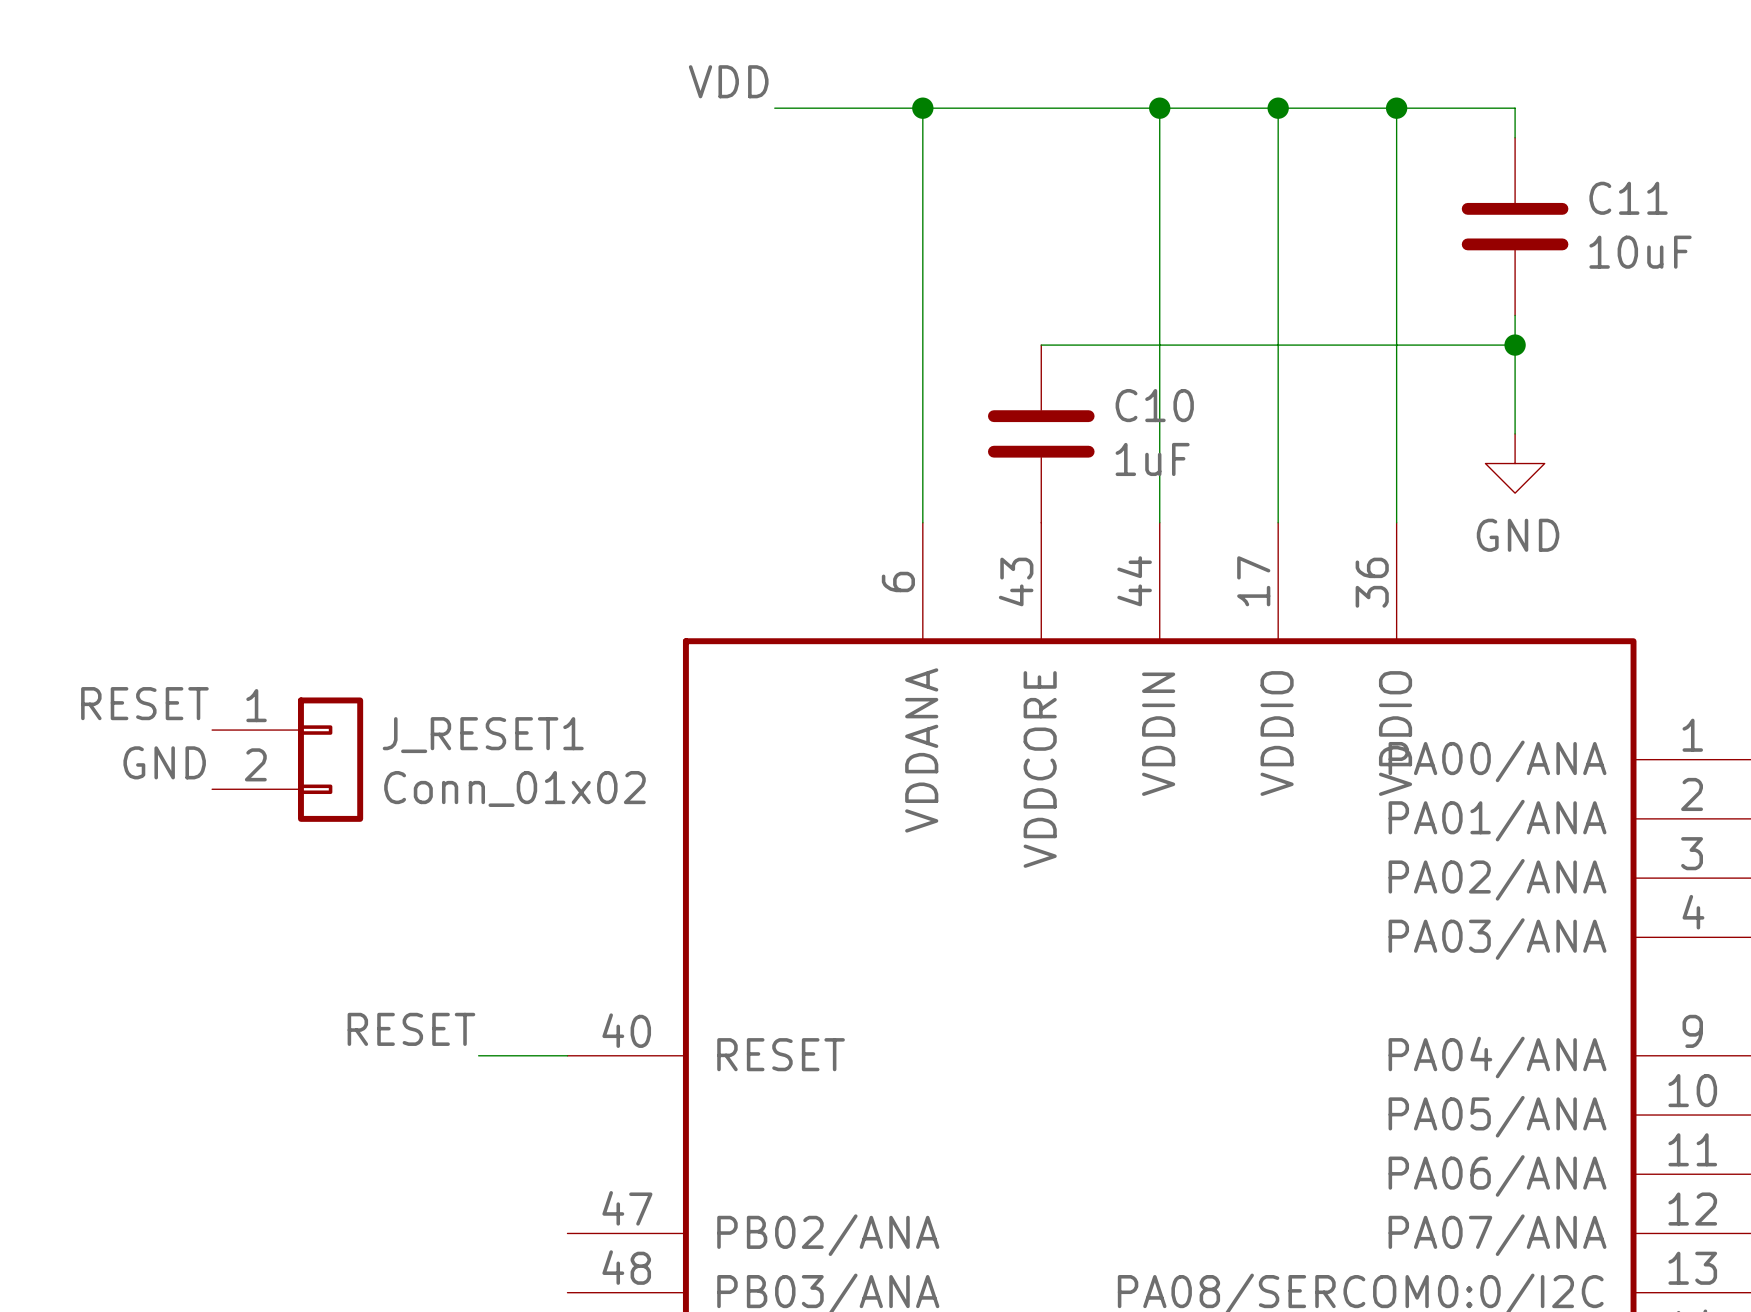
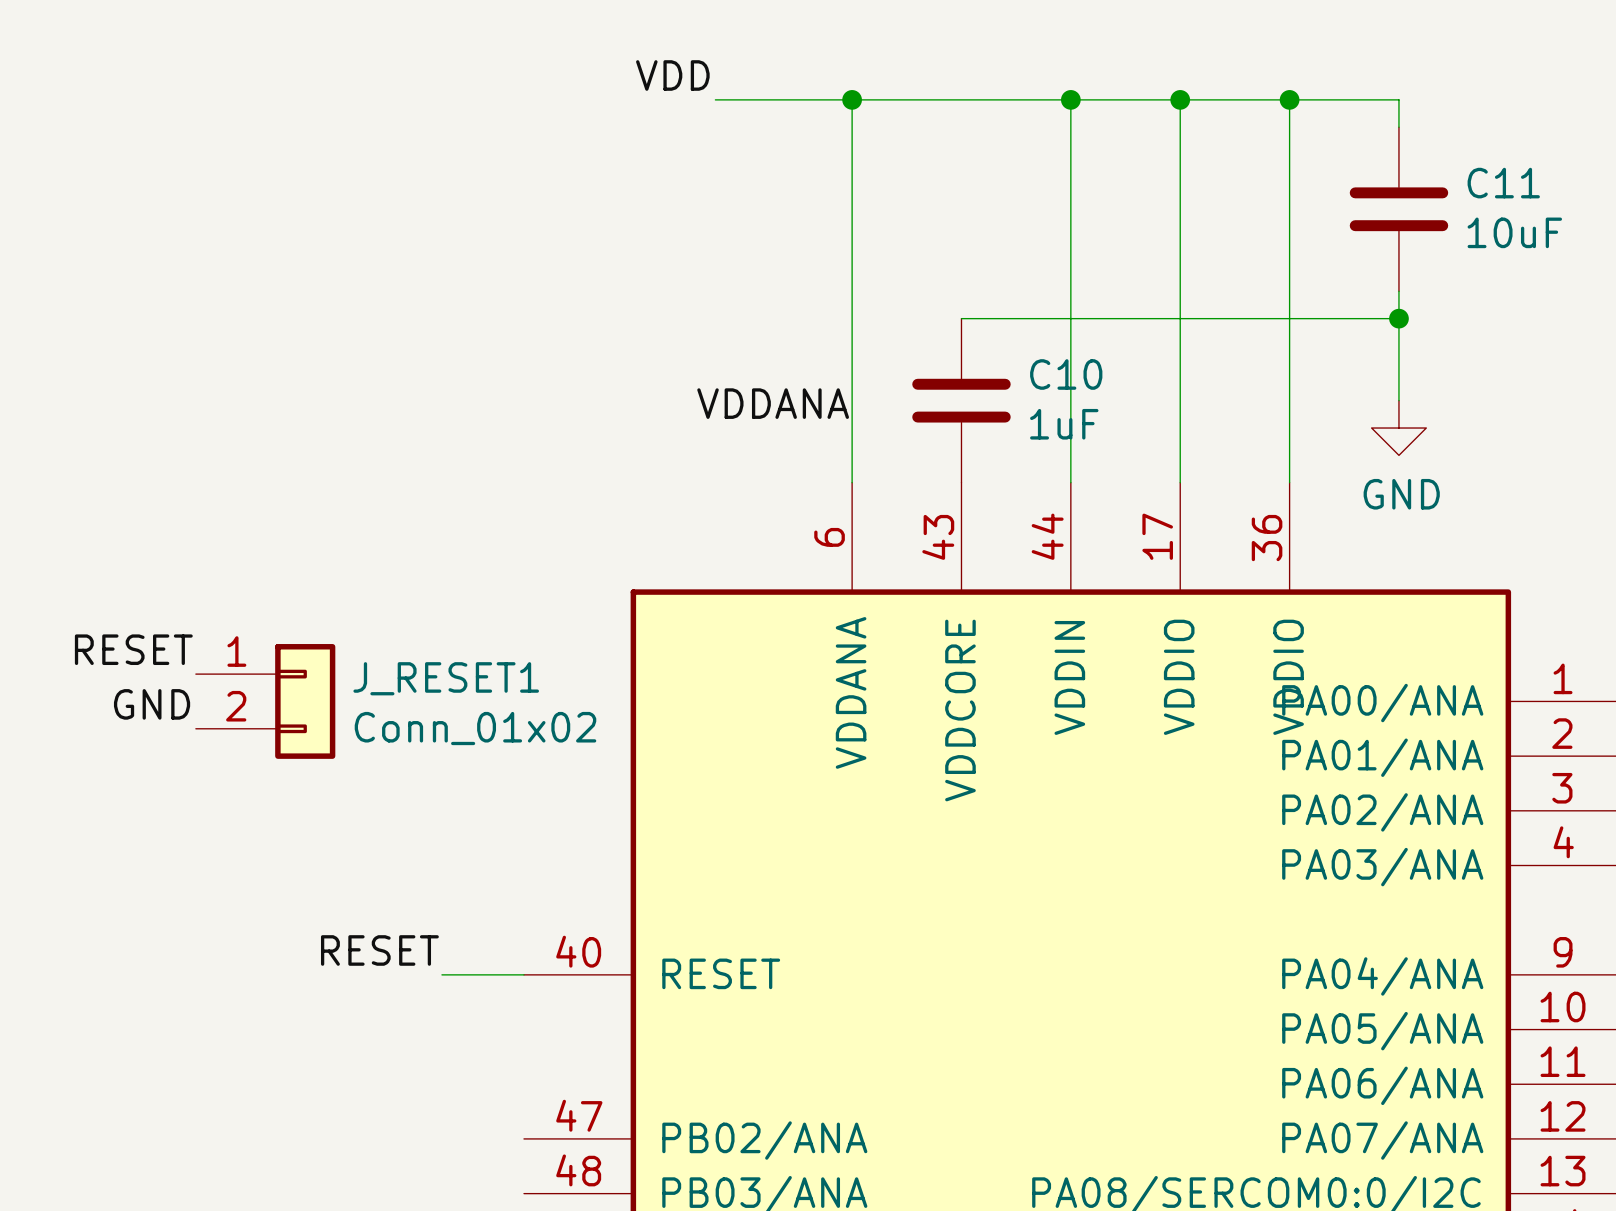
label: none -> VDDANA (773, 403)

